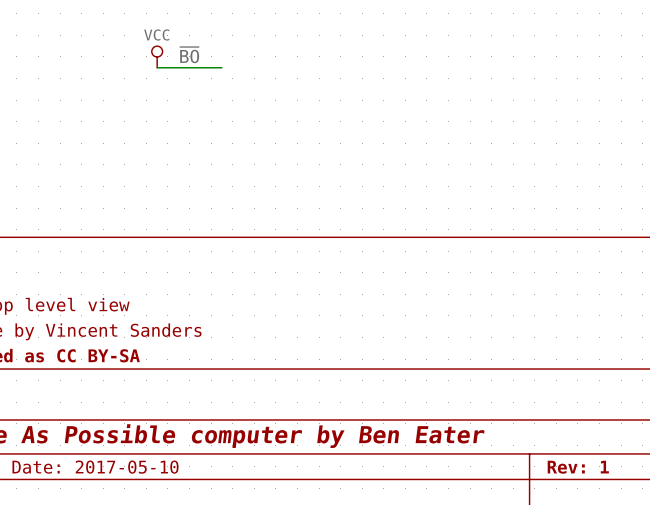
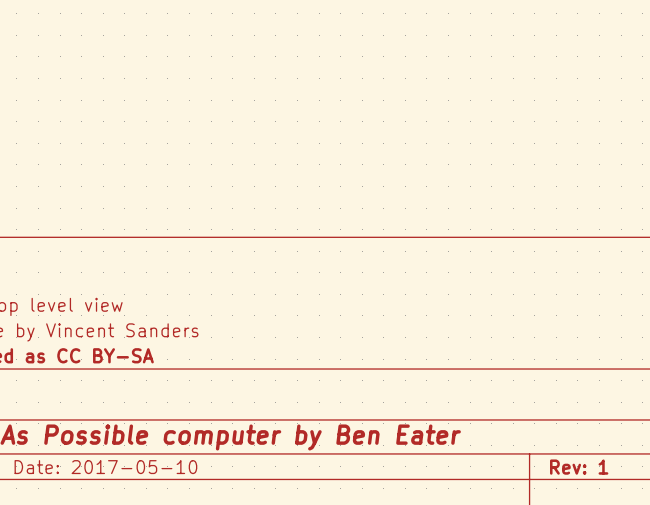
label: ~{BO} (189, 55) -> none
power symbol: VCC (157, 56) -> none
wire: (157, 67) (221, 67) -> none

